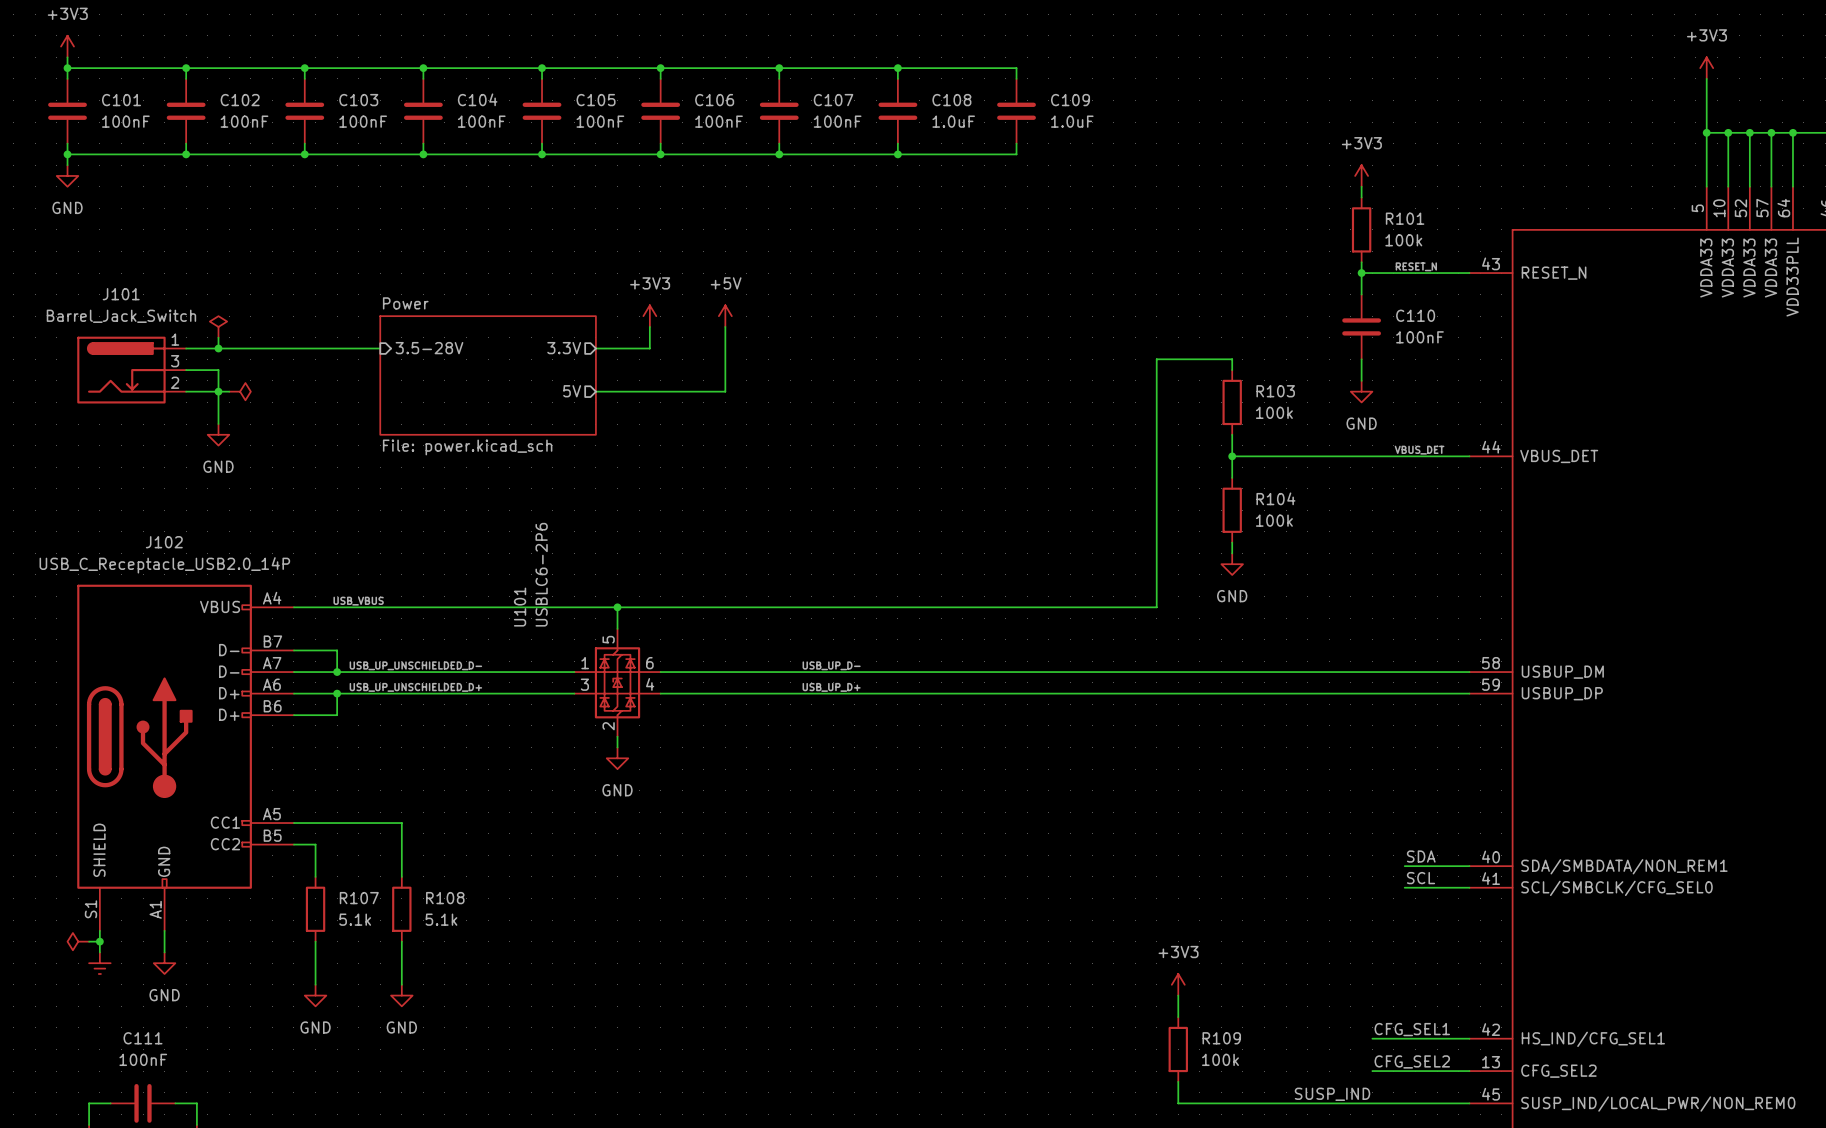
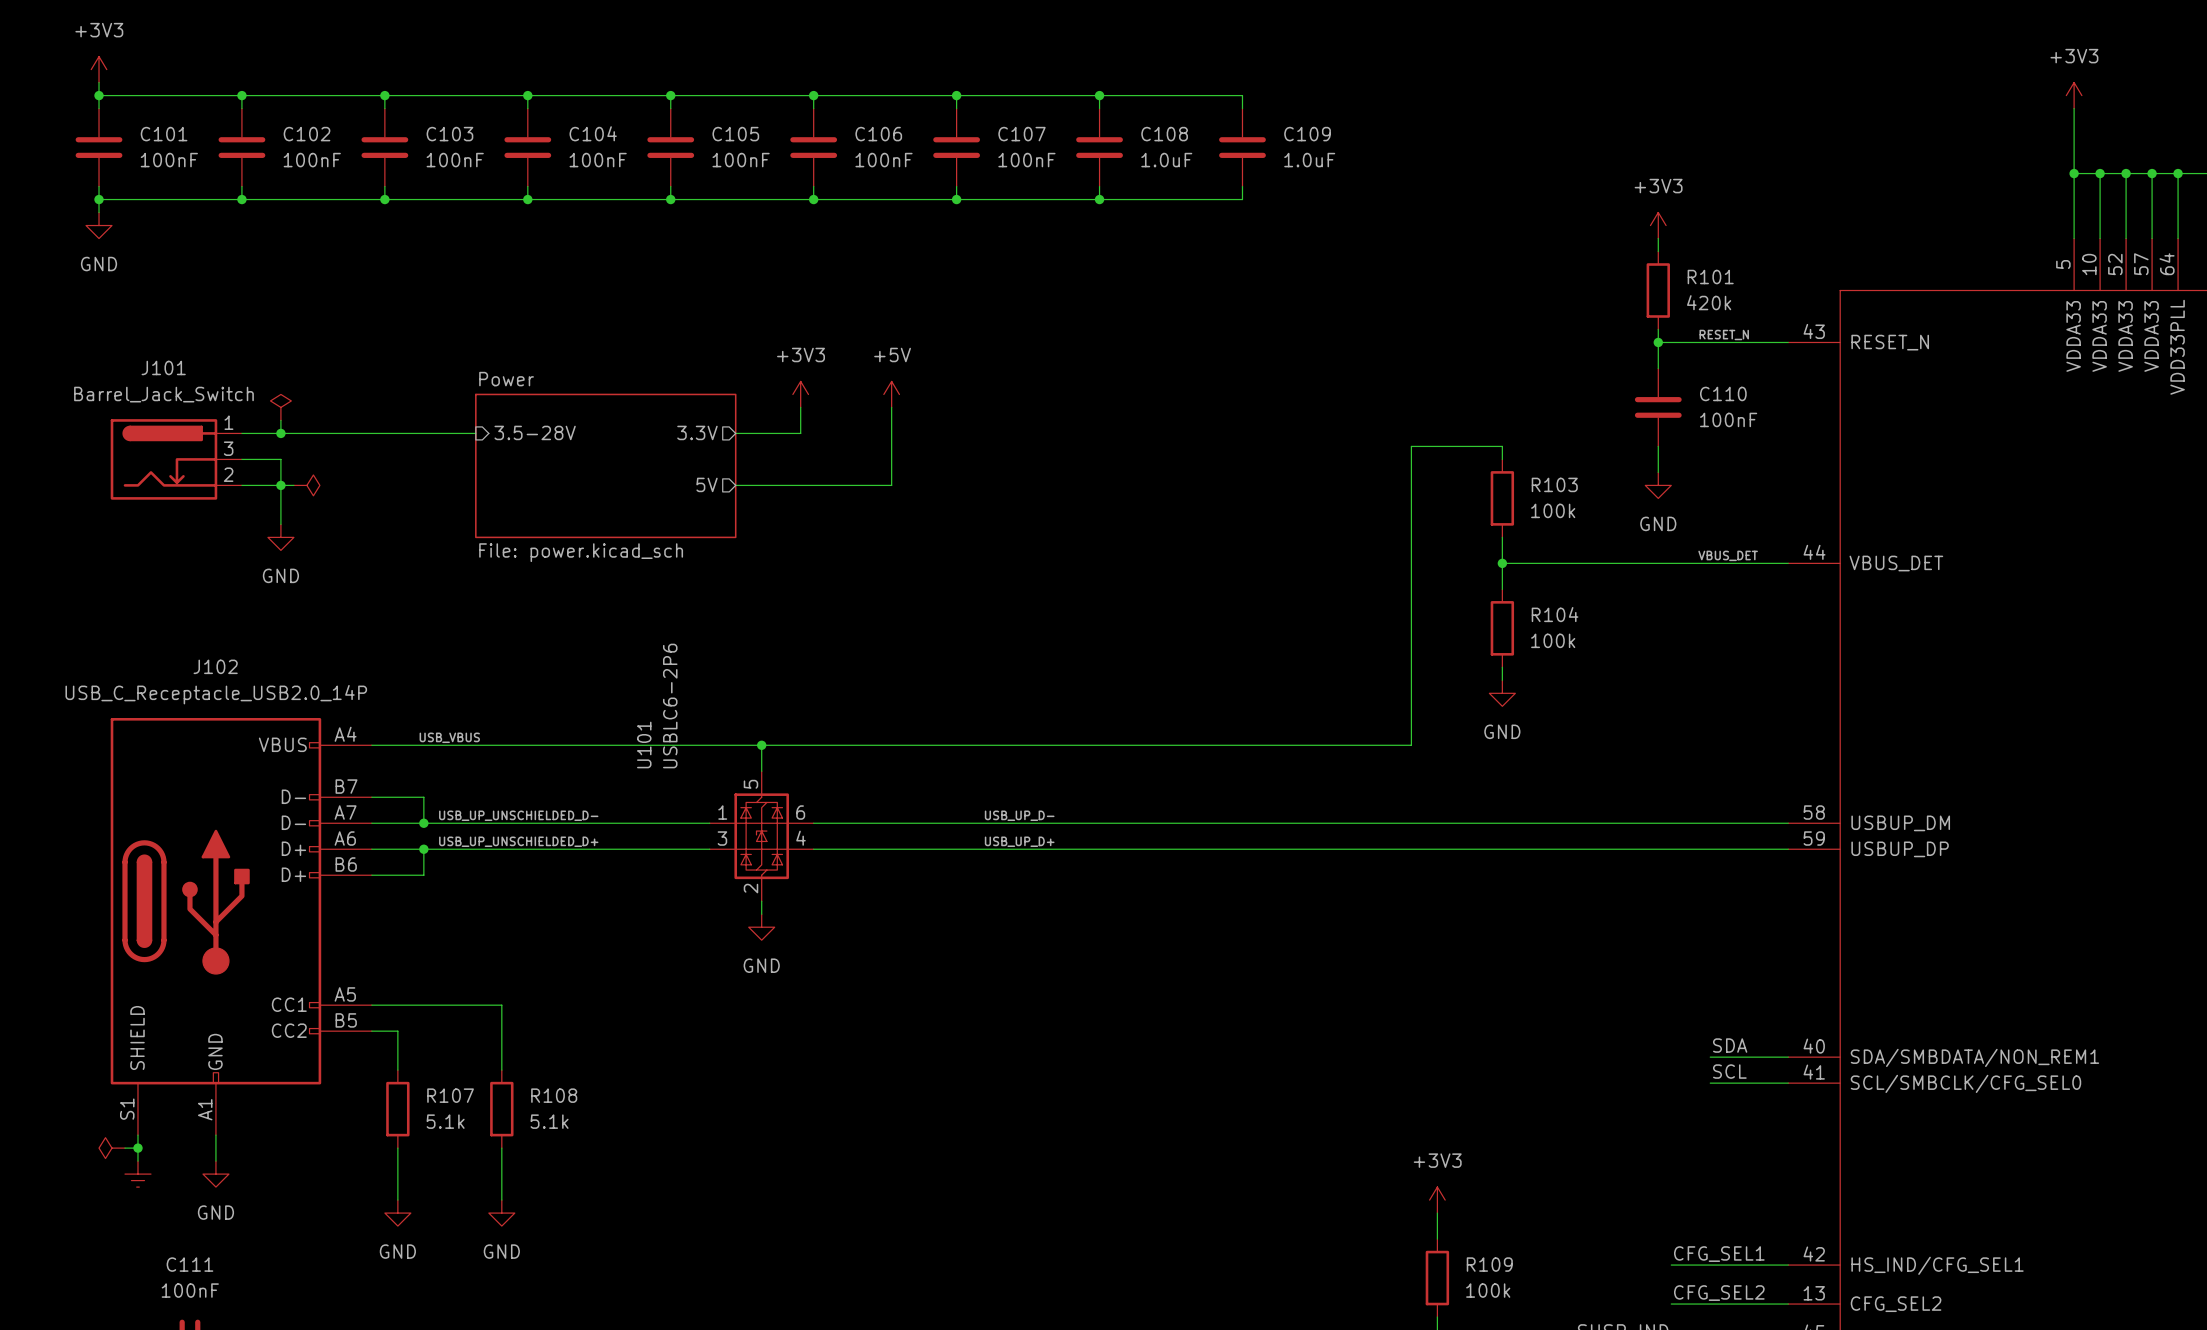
R101 value: 100k (1403, 240) -> 420k (1709, 302)

